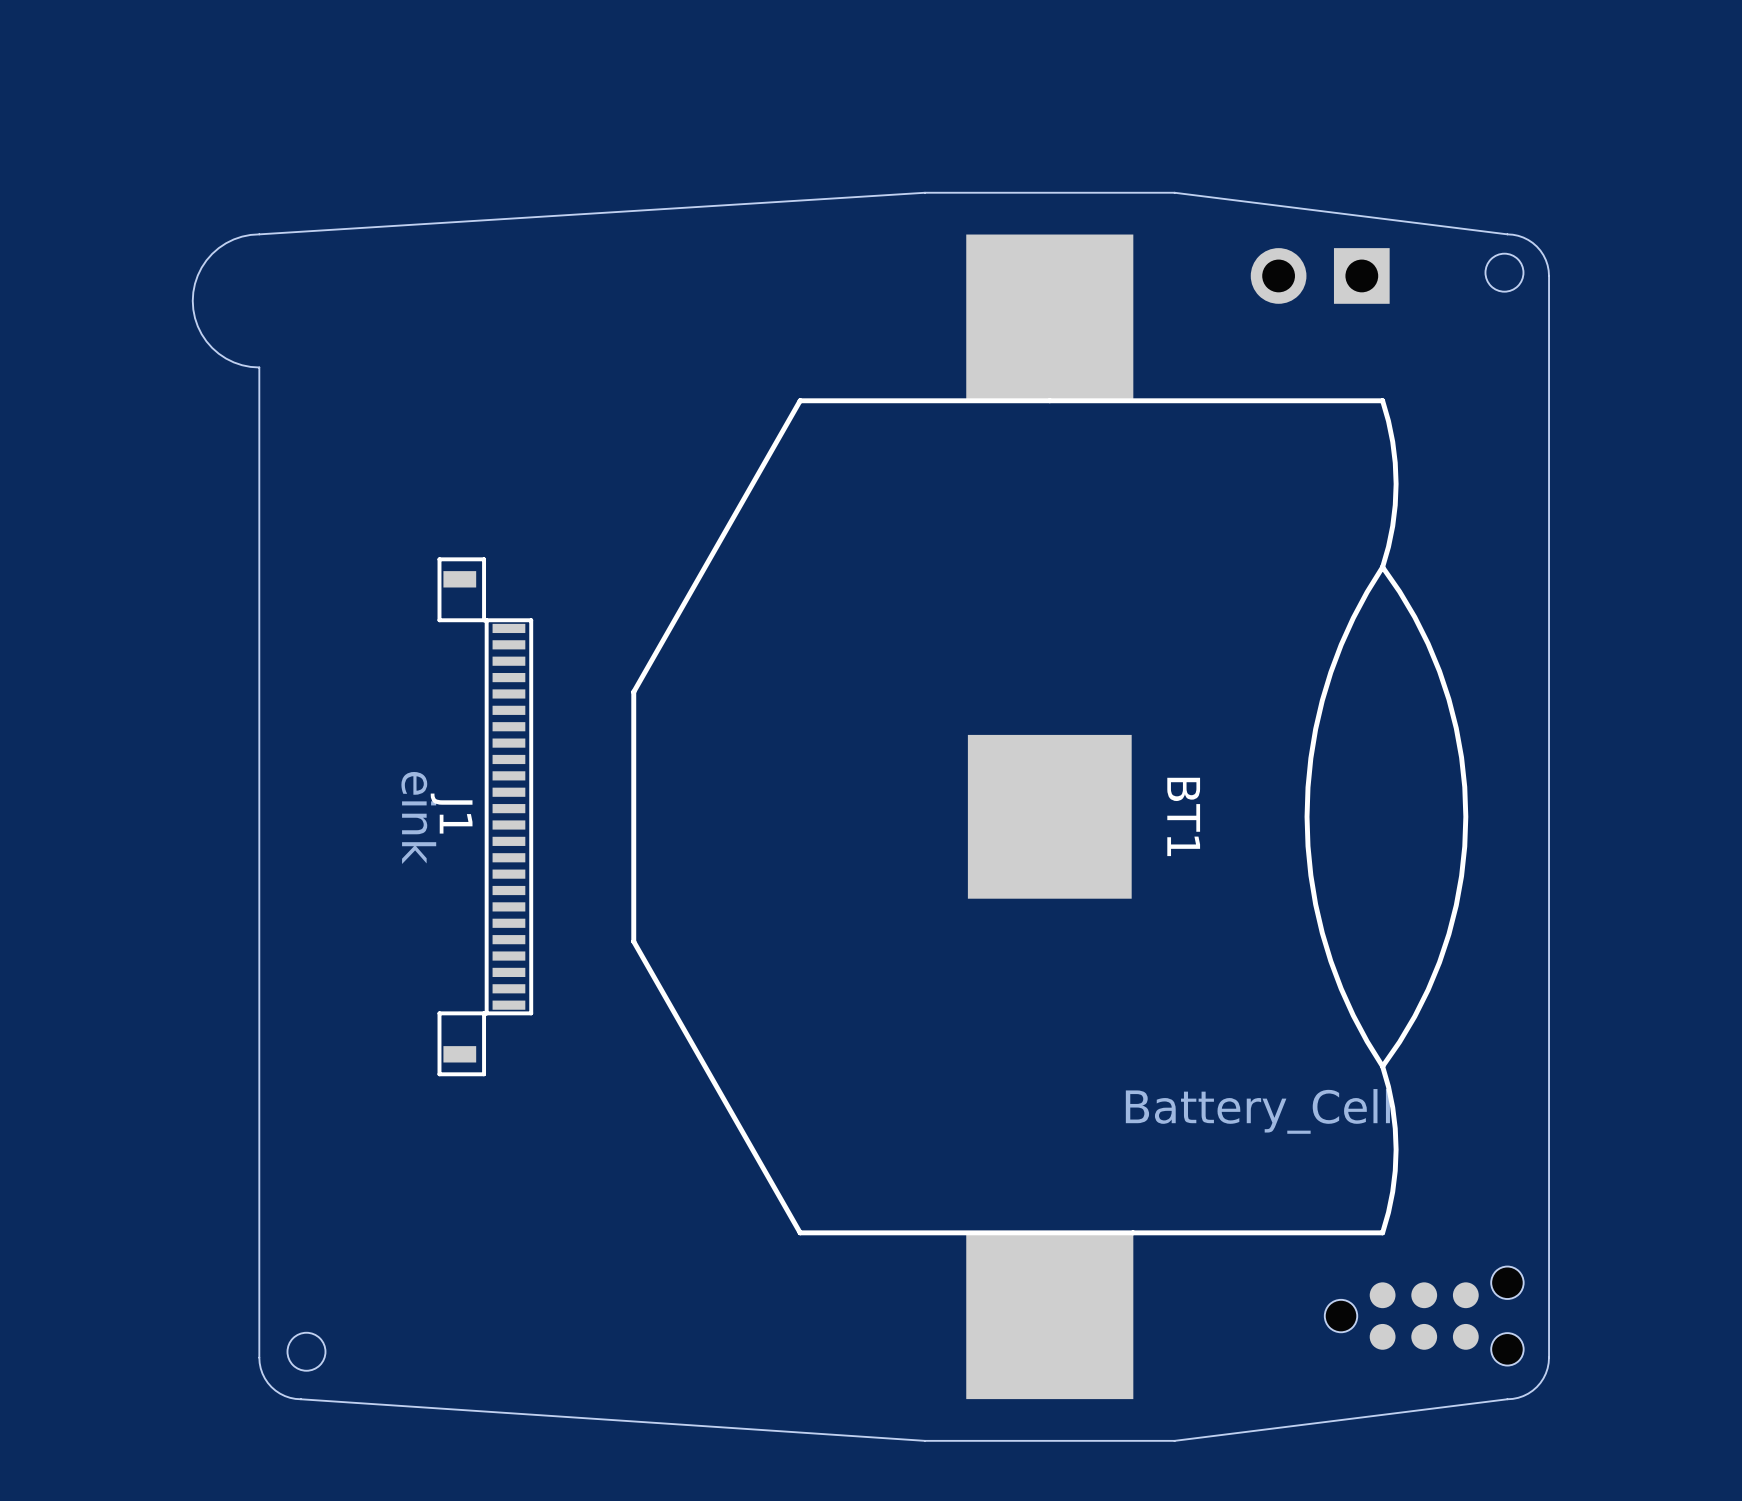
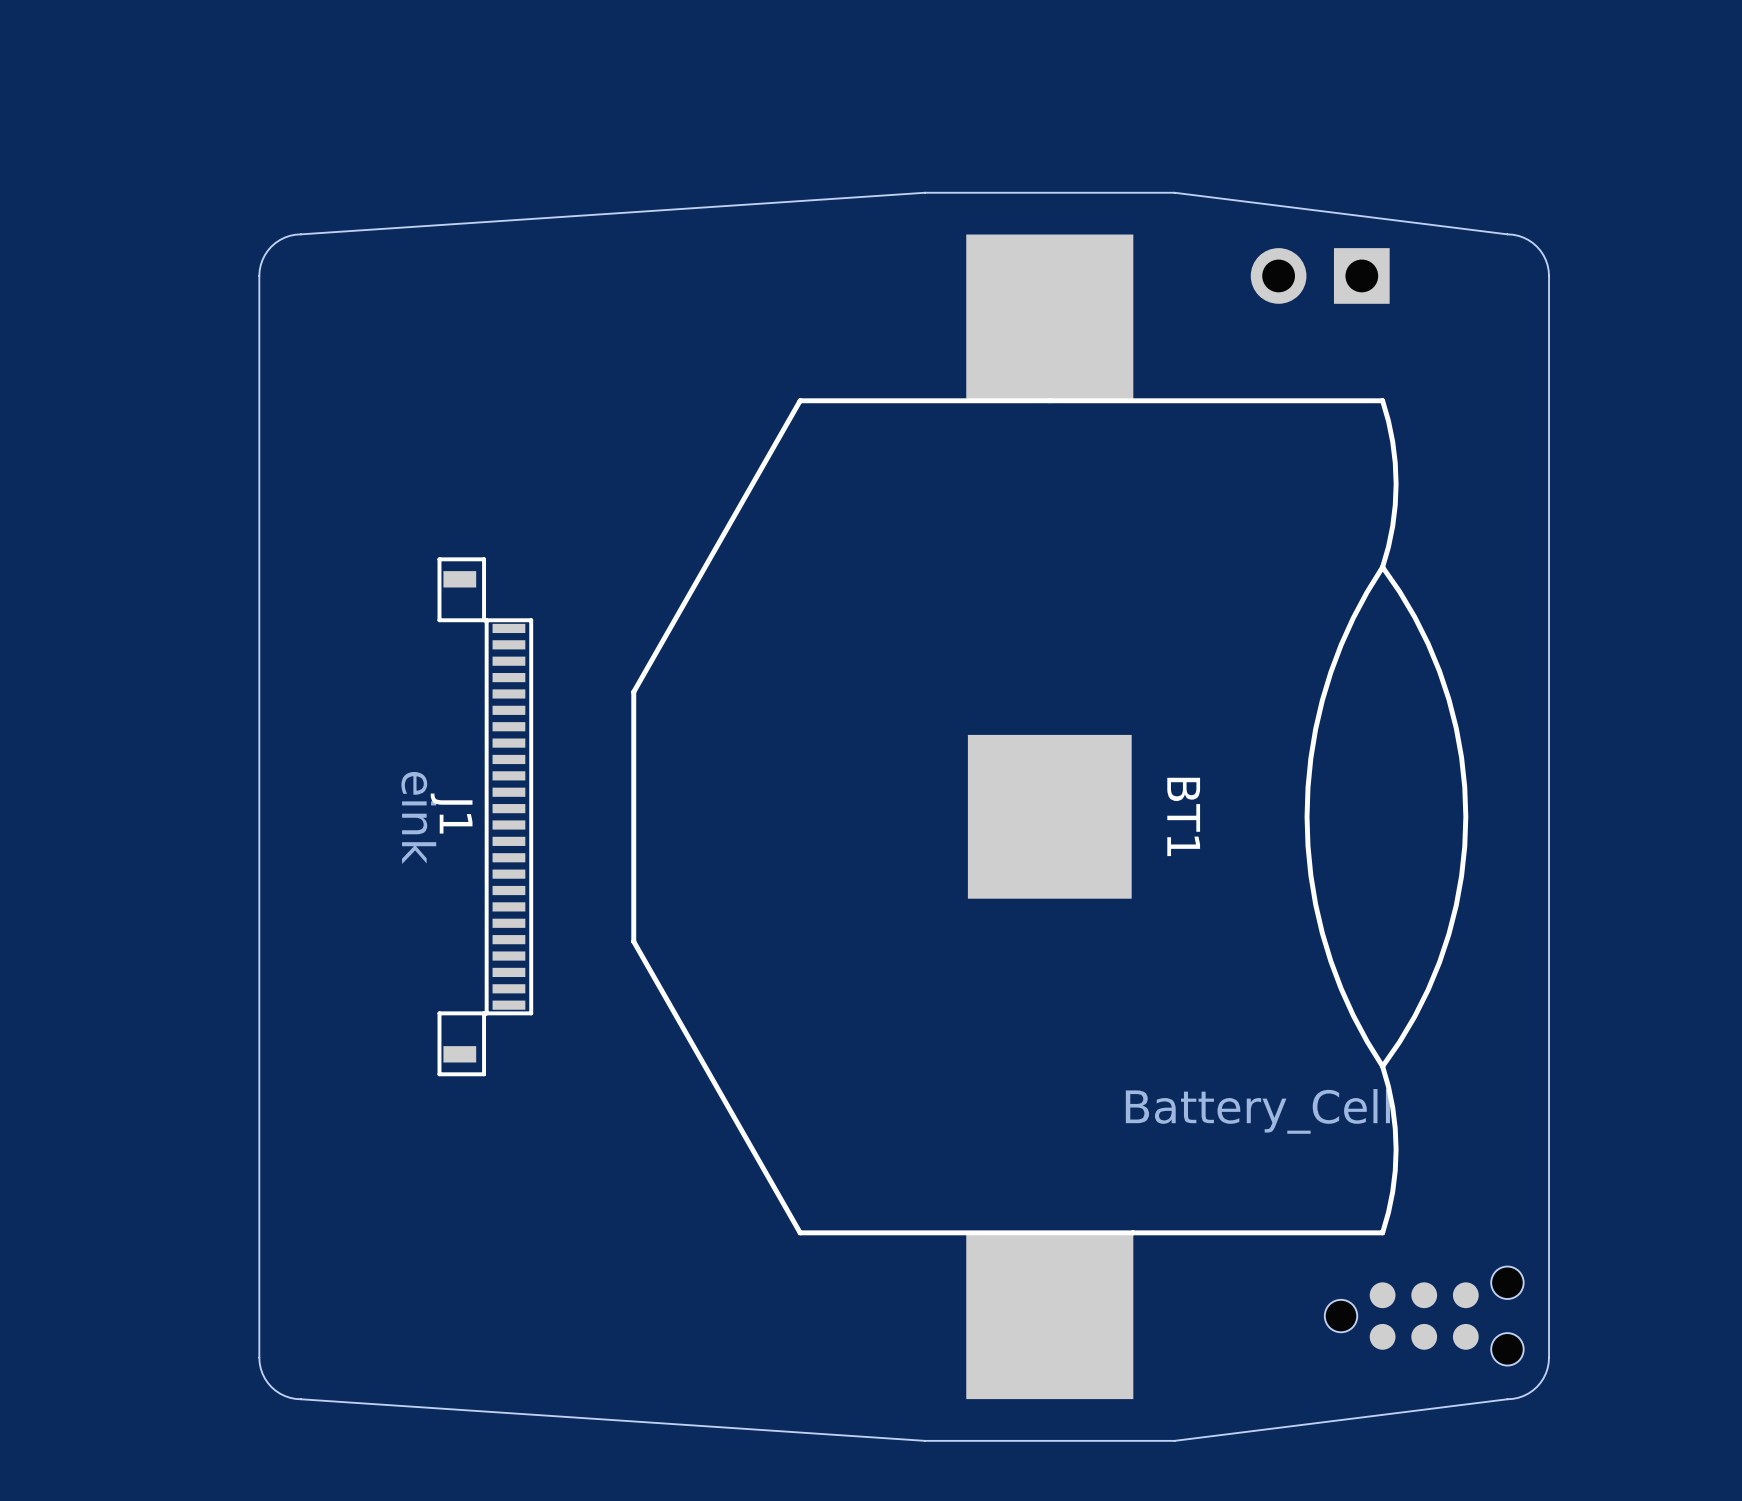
board edge: (924, 192) (242, 236) (218, 248) (201, 267) (195, 283) (193, 309) (201, 334) (218, 353) (242, 365) (259, 367) -> (924, 192) (290, 235) (271, 246) (260, 265) (259, 367)
round board edge: [1484, 252, 1525, 293] -> none
round board edge: [286, 1331, 327, 1372] -> none

